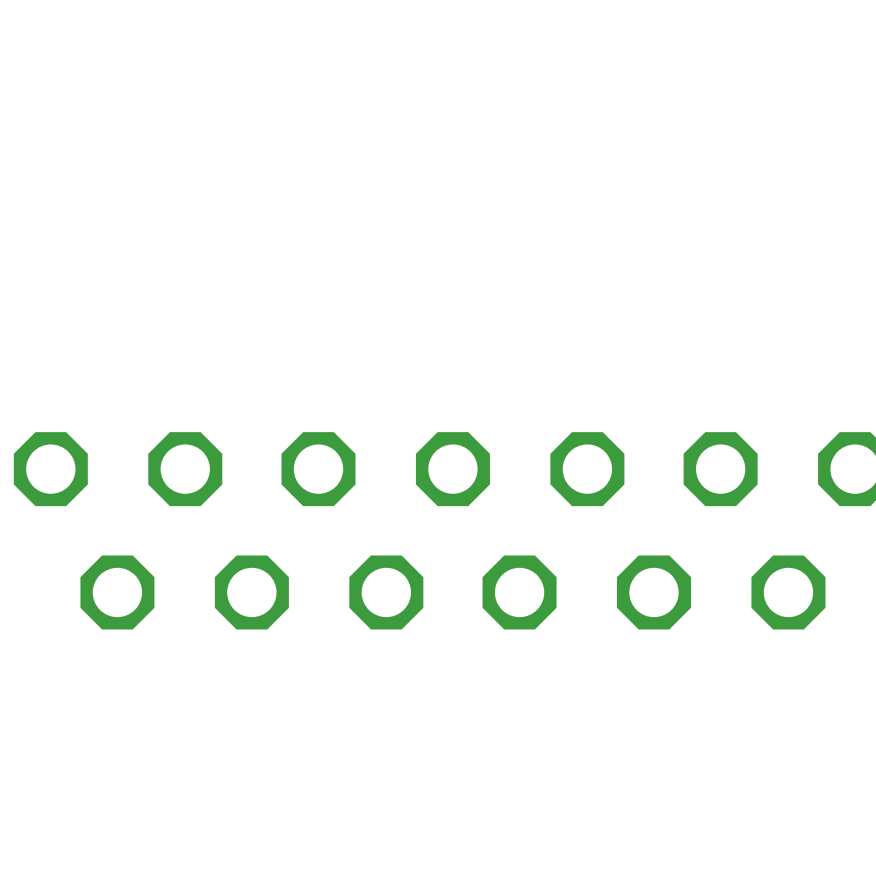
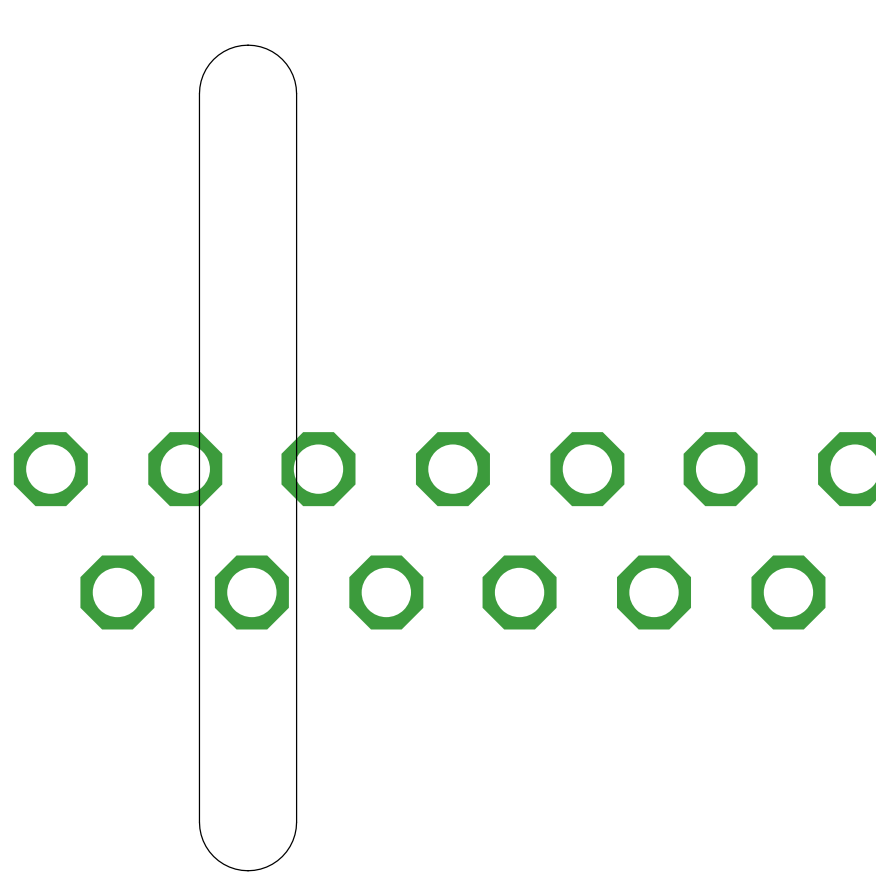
board edge: none -> (248, 45) (266, 48) (282, 59) (292, 75) (296, 93) (296, 822) (292, 840) (282, 856) (266, 867) (248, 870) (229, 867) (213, 856) (203, 840) (199, 822) (199, 93) (203, 75) (213, 59) (229, 48) (248, 45)

